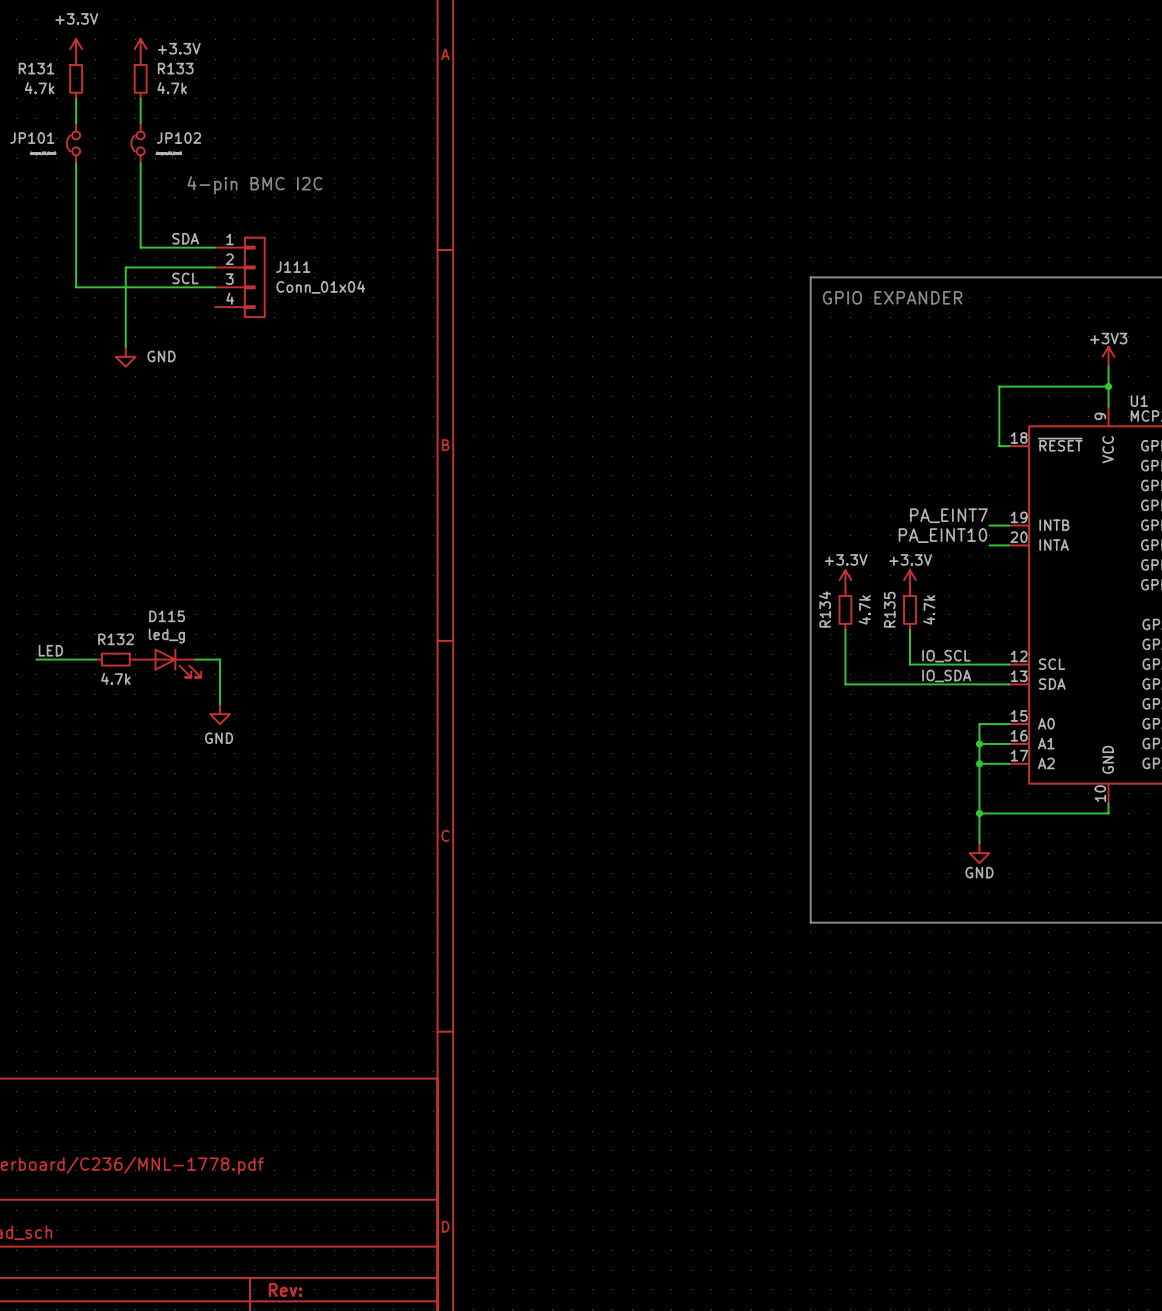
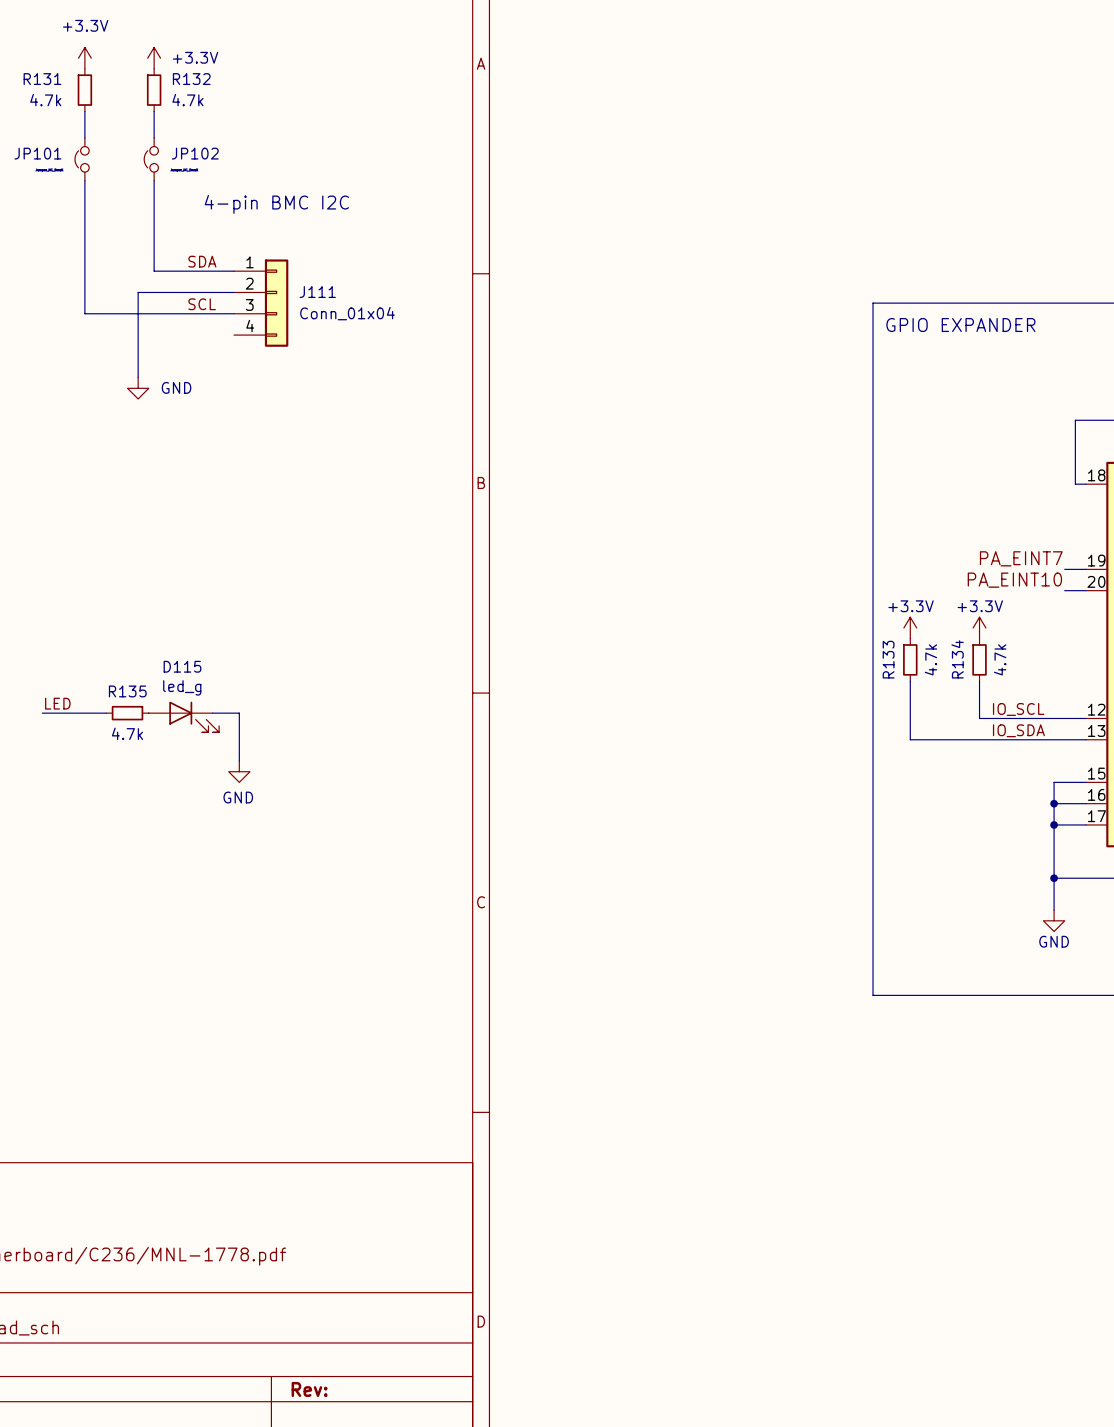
R133 name: R133 (175, 68) -> R132 (191, 79)
R134 name: R134 (825, 609) -> R133 (888, 659)
R135 name: R135 (889, 609) -> R134 (957, 659)
R132 name: R132 (116, 639) -> R135 (127, 691)

